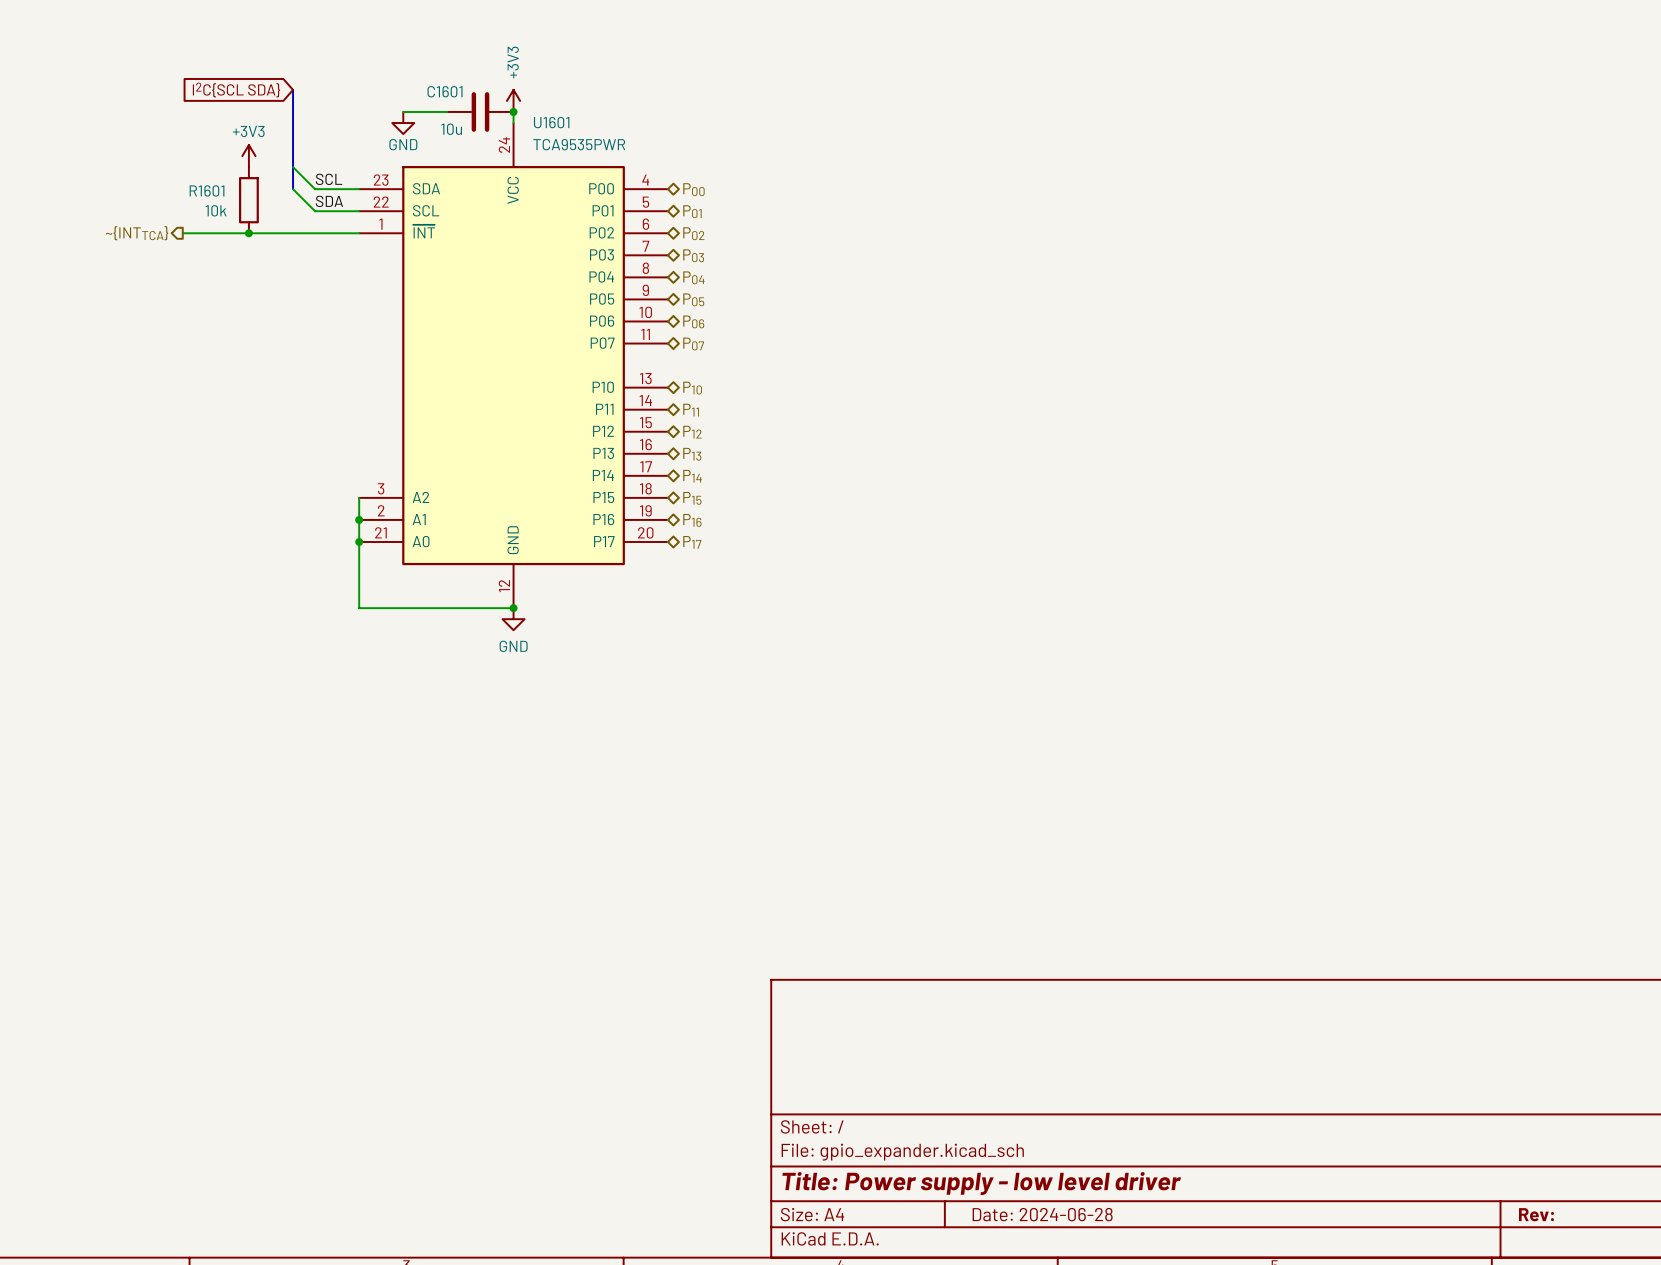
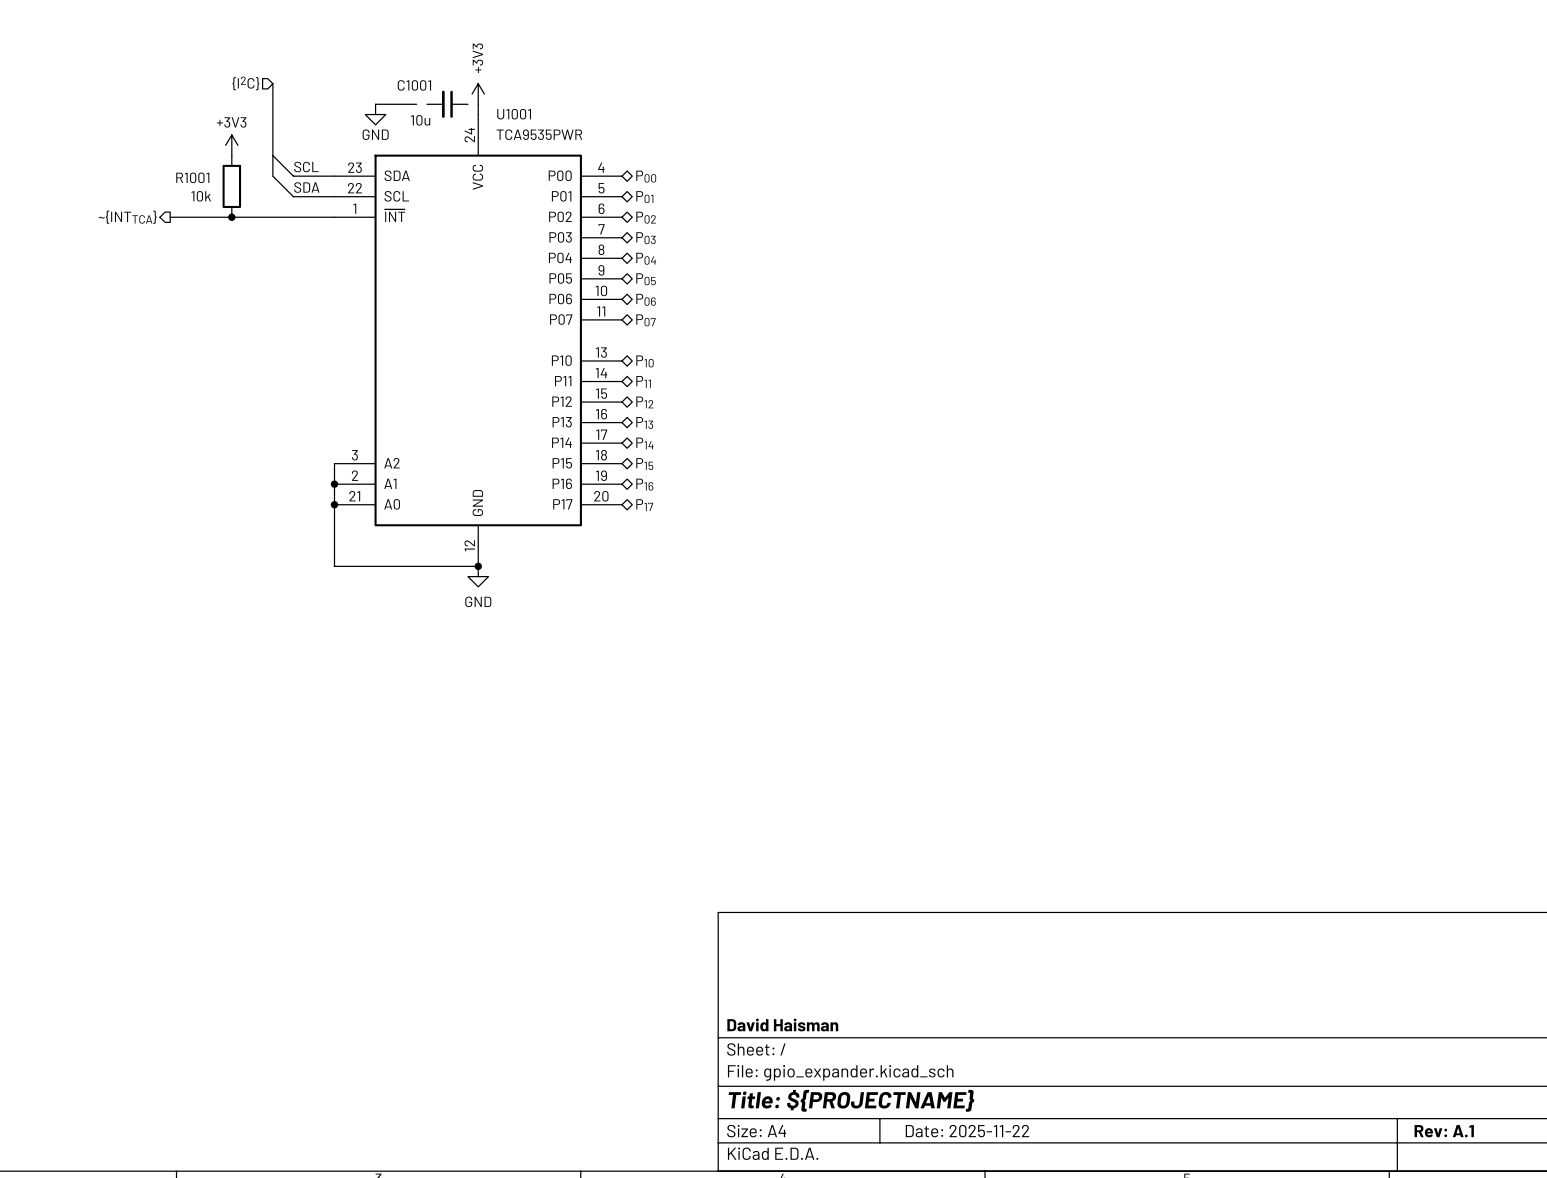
hierarchical label: none -> {I2C} (245, 83)
global label: I2C{SCL SDA} (236, 90) -> none
C1601: 10u (480, 111) -> none
C1001: none -> 10u (447, 104)
junction: (513, 111) -> none
U1601 name: U1601 (551, 122) -> U1001 (514, 114)
R1601 name: R1601 (207, 190) -> R1001 (192, 177)
title block: none -> David Haisman (782, 1025)
title block: Title: Power supply - low level driver (981, 1183) -> Title: ${PROJECTNAME} (851, 1100)
title block: Date: 2024-06-28 (1042, 1214) -> Date: 2025-11-22 (967, 1131)
title block: Rev: (1536, 1214) -> Rev: A.1 (1444, 1131)

